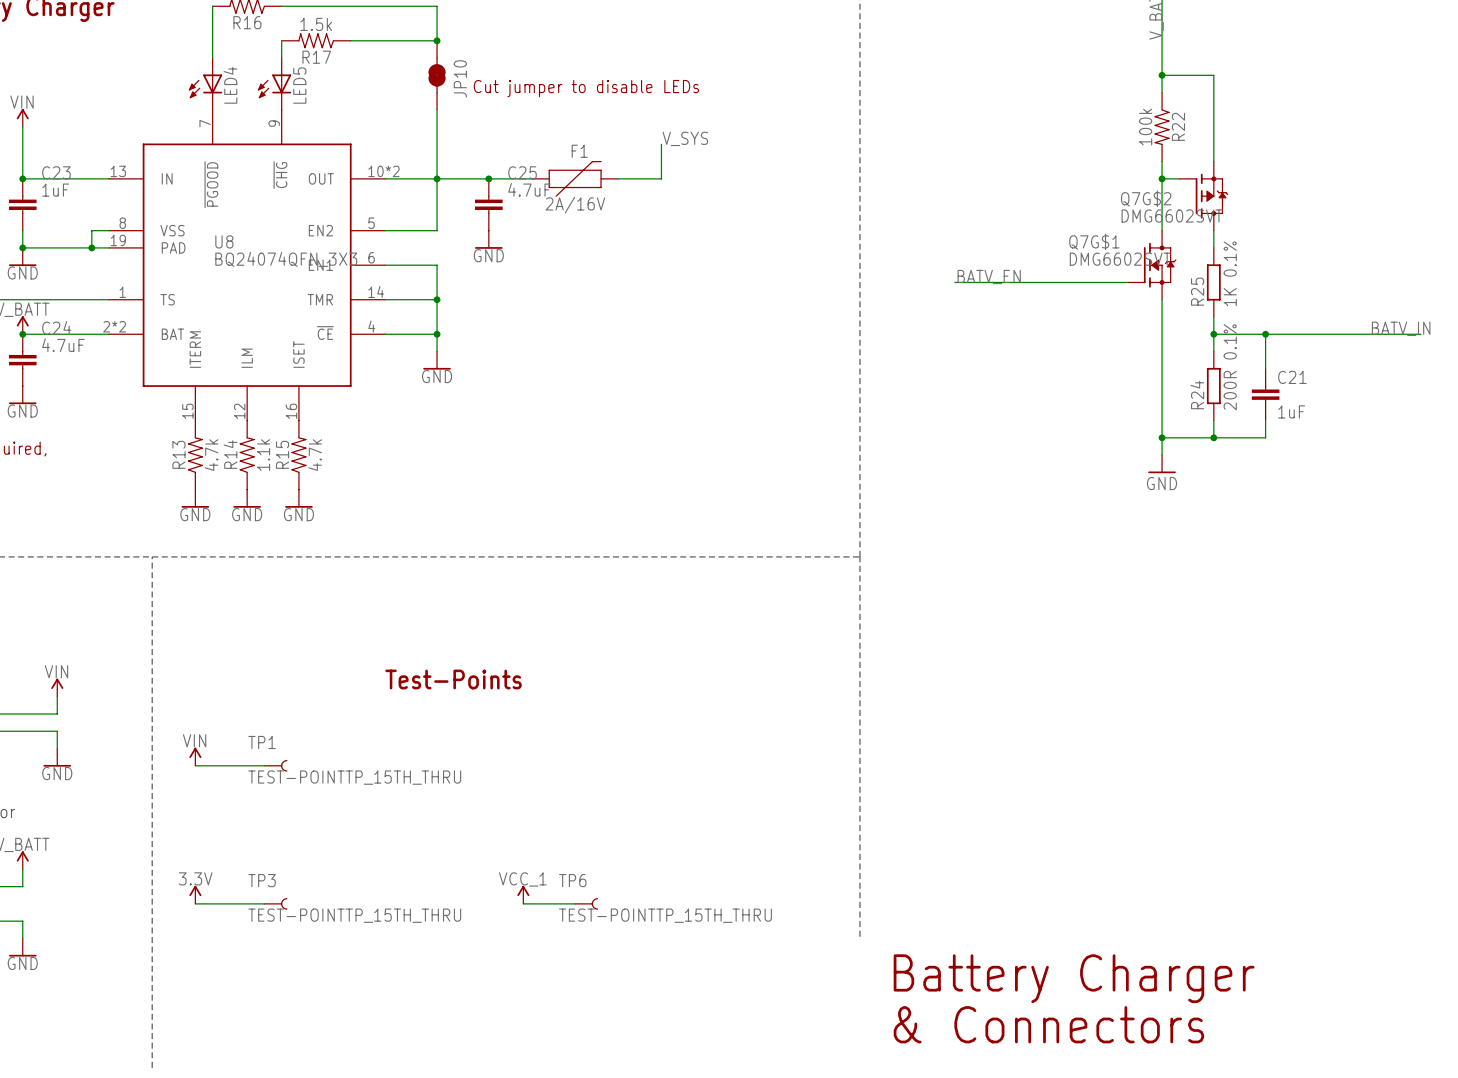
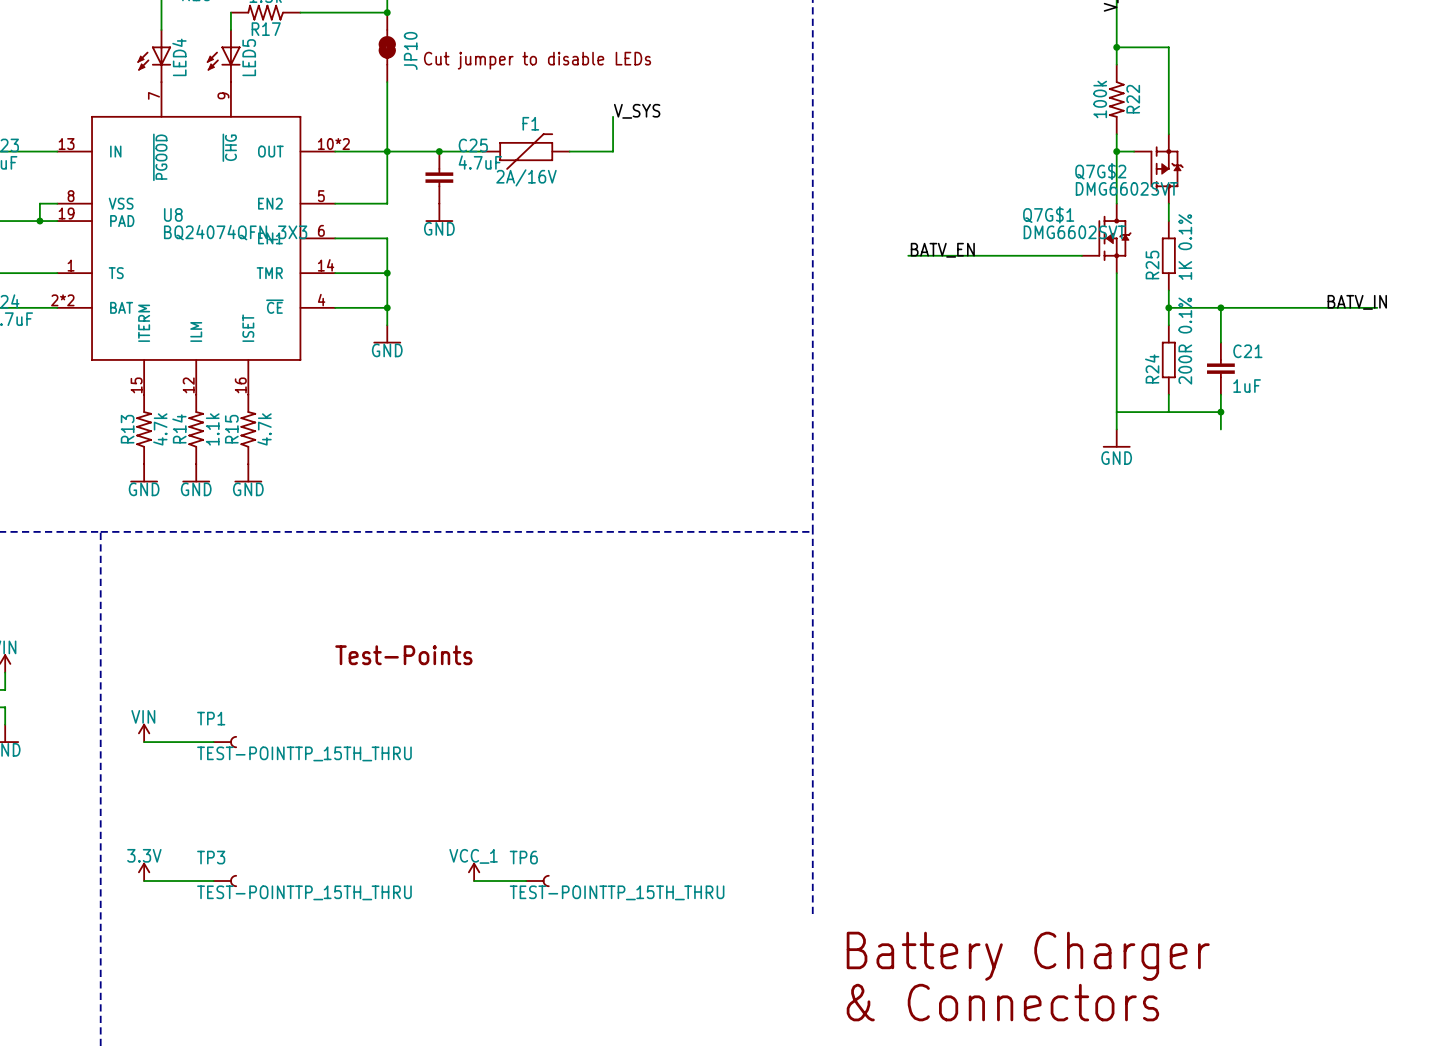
junction: (1162, 437) -> none
junction: (1213, 437) -> none
wire: none -> (1220, 412) (1220, 429)
junction: none -> (1220, 412)

